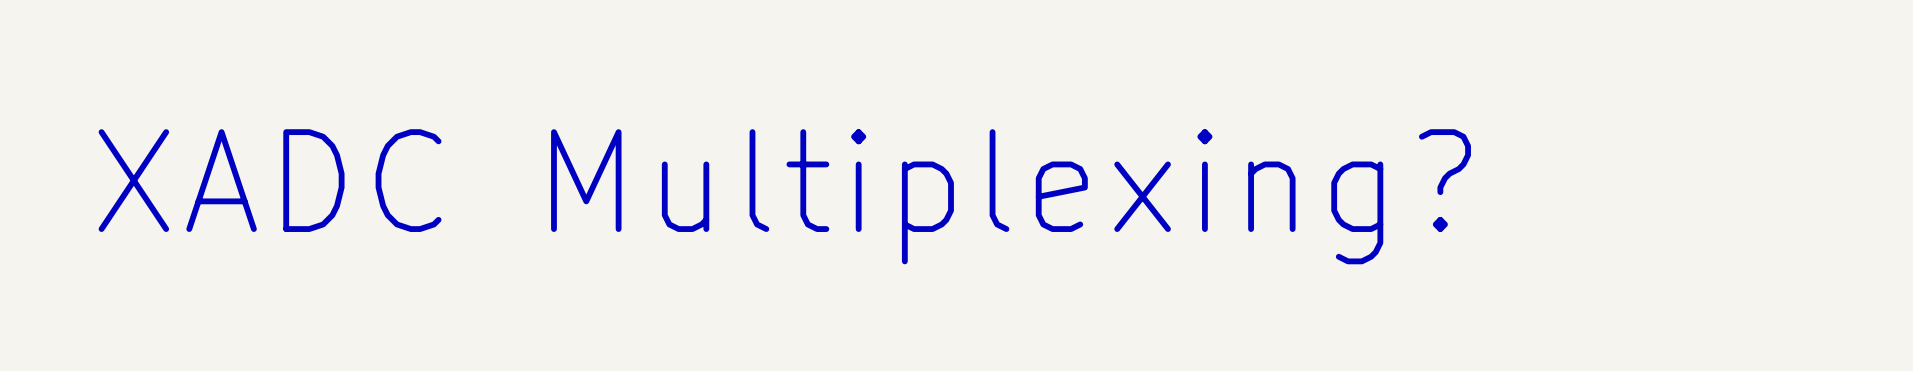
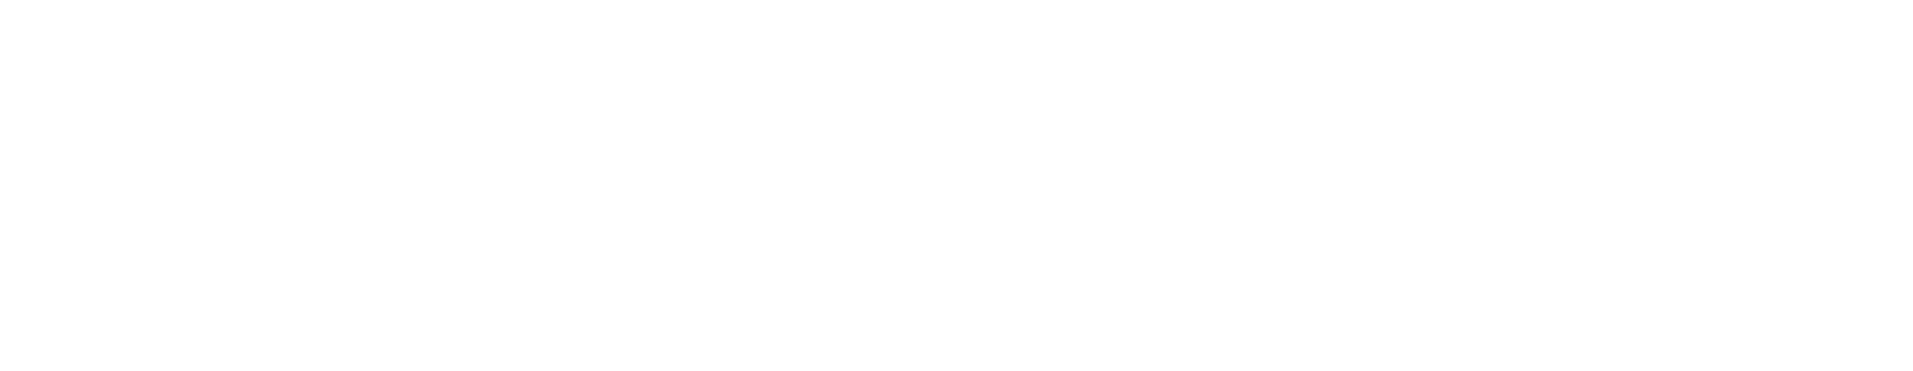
text: XADC Multiplexing? (784, 196) -> none

